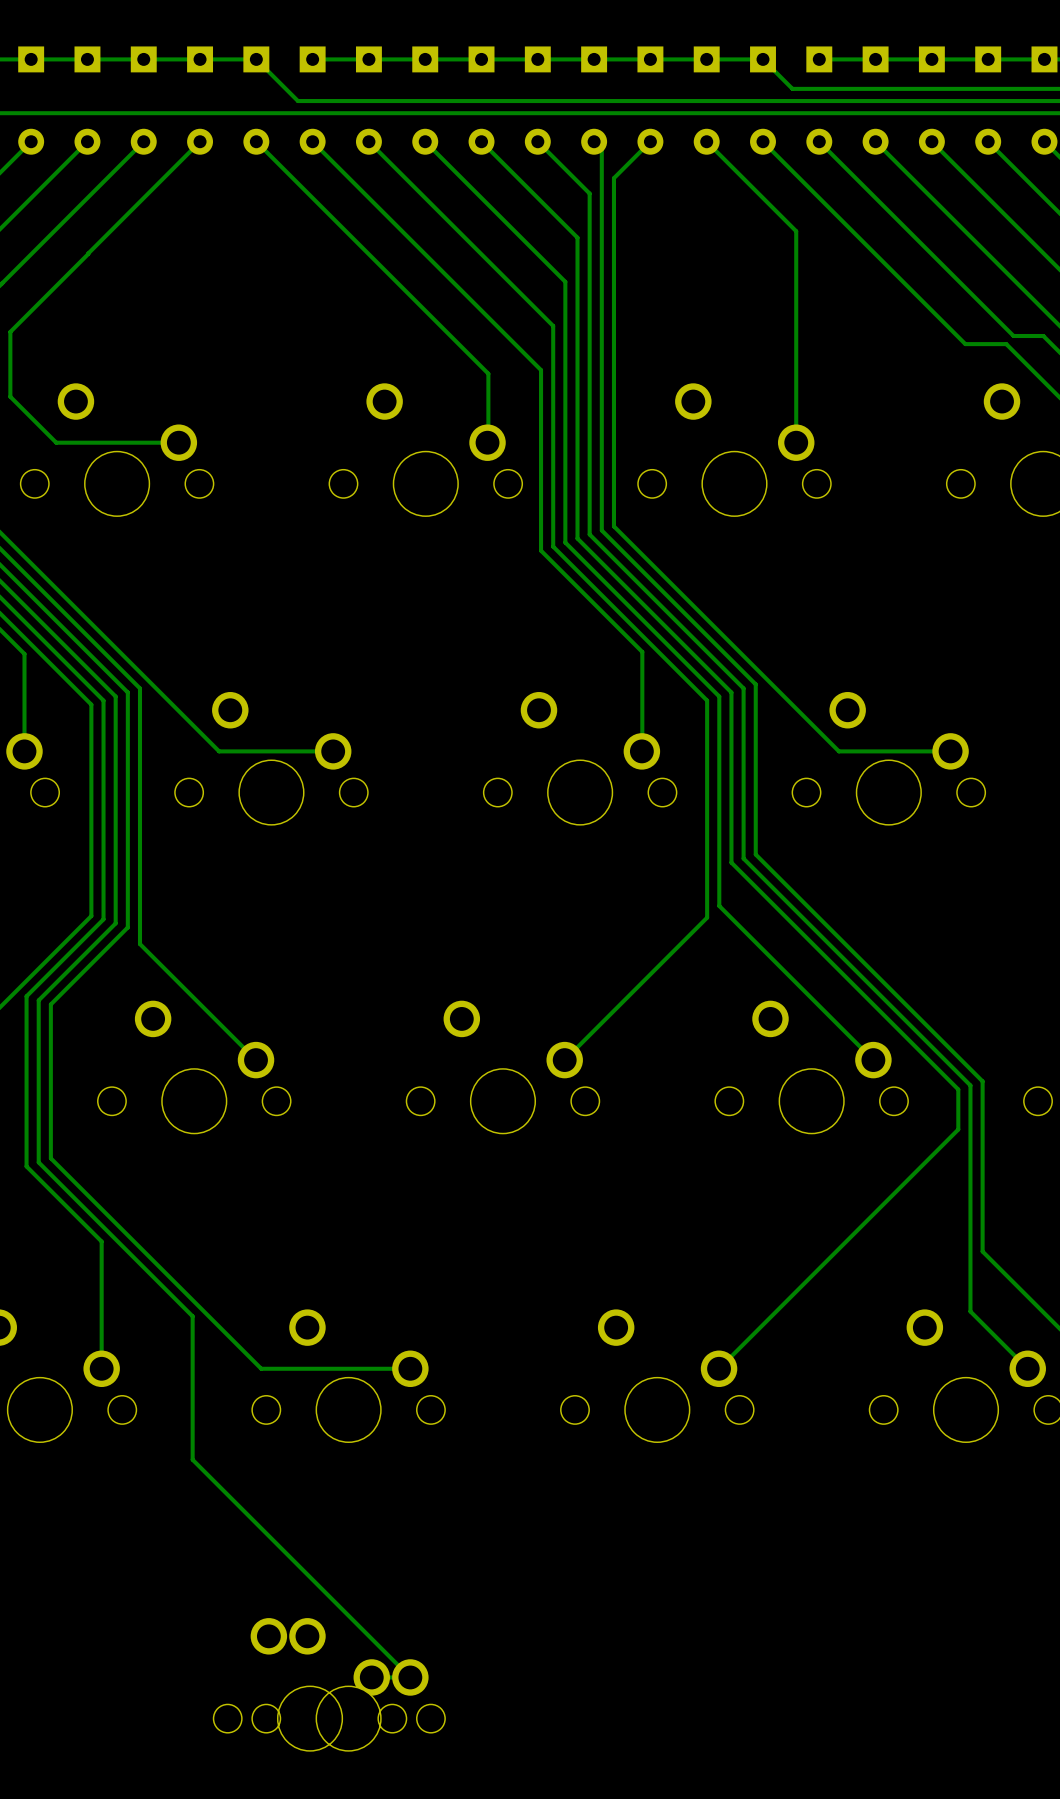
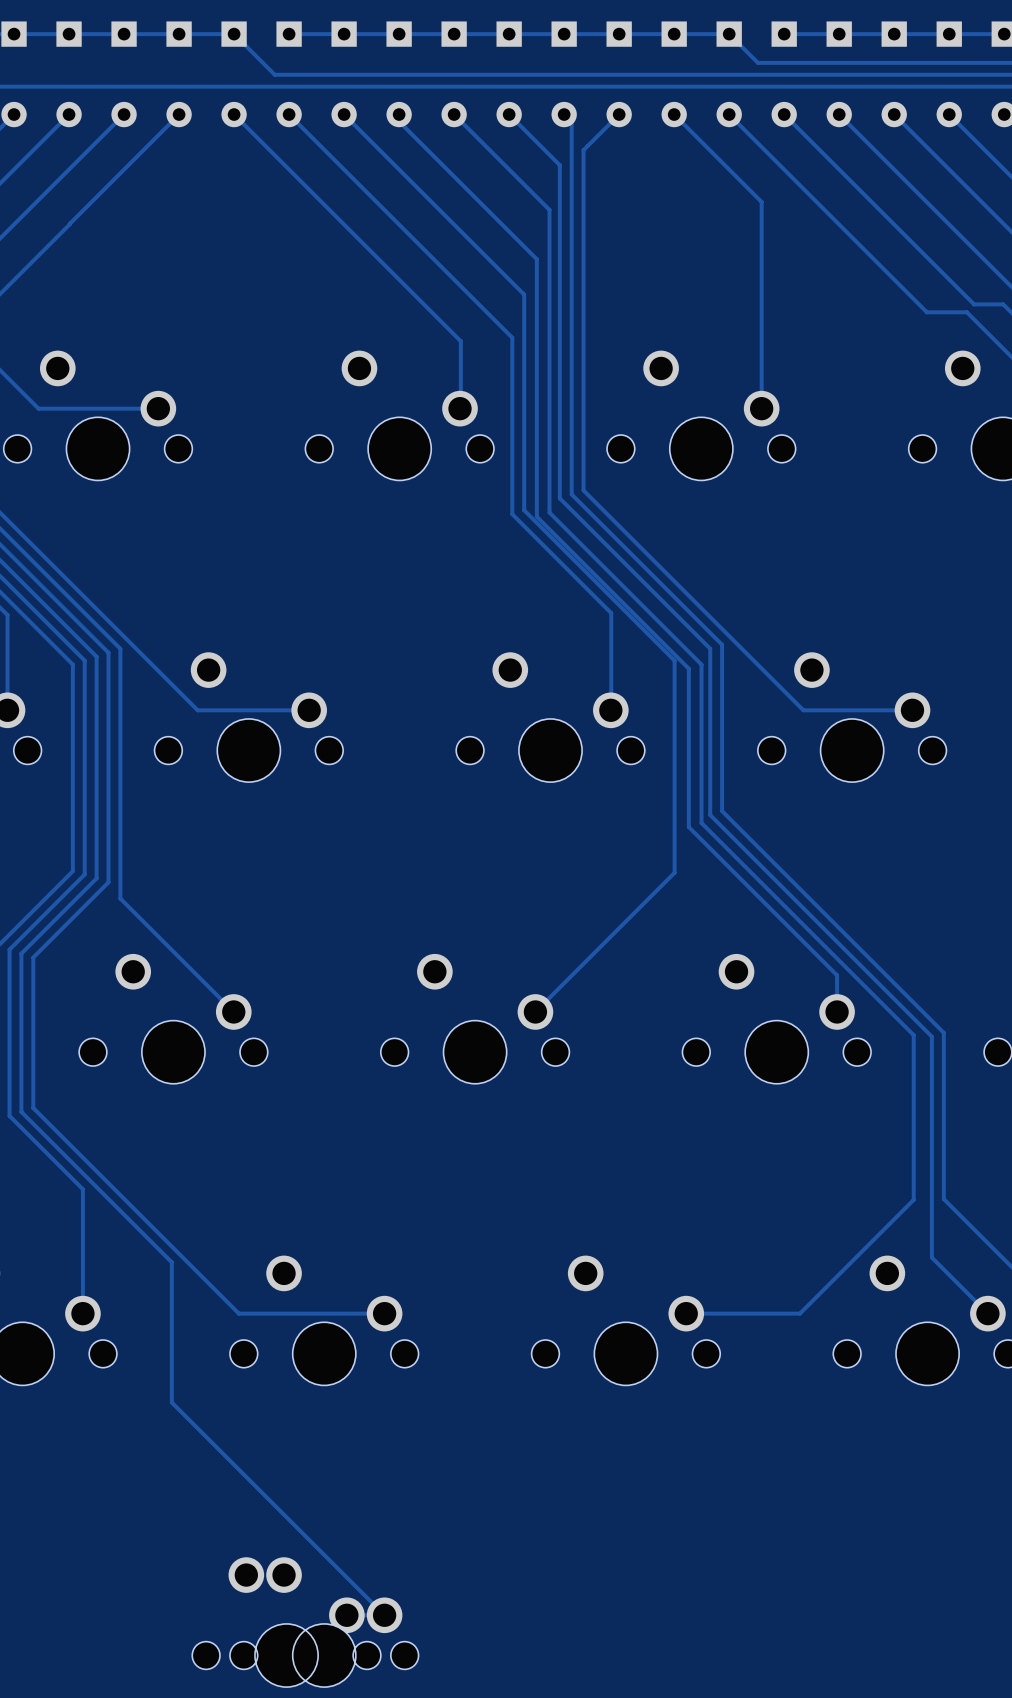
track: (425, 141) (565, 281) (565, 542) (719, 696) (719, 905) (873, 1060) -> (399, 114) (399, 121) (536, 259) (536, 516) (688, 668) (688, 827) (837, 975) (837, 1011)
track: (577, 237) (577, 538) (731, 692) (731, 862) (958, 1089) (958, 1129) (719, 1368) -> (547, 208) (549, 209) (549, 512) (701, 664) (701, 822) (913, 1035) (913, 1199) (799, 1313) (686, 1313)

